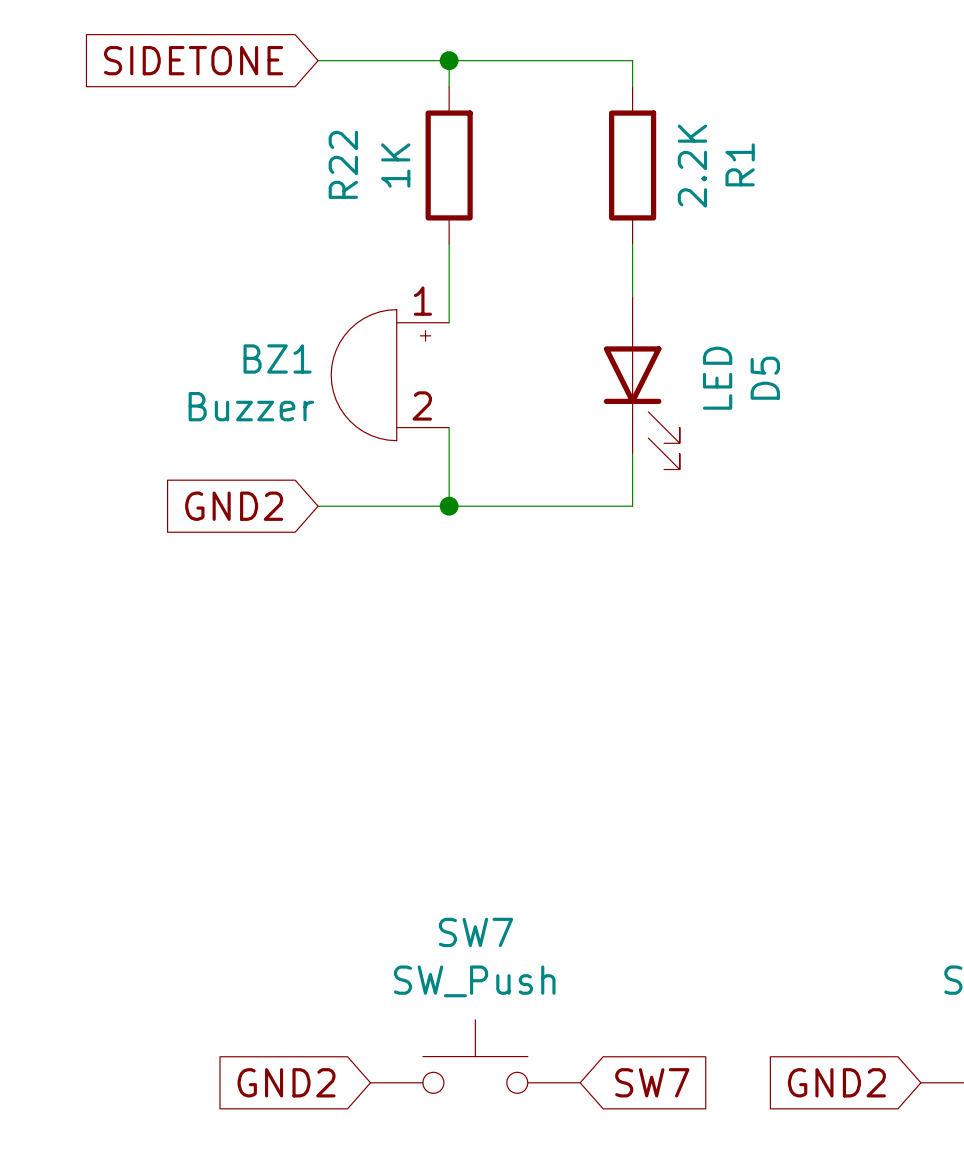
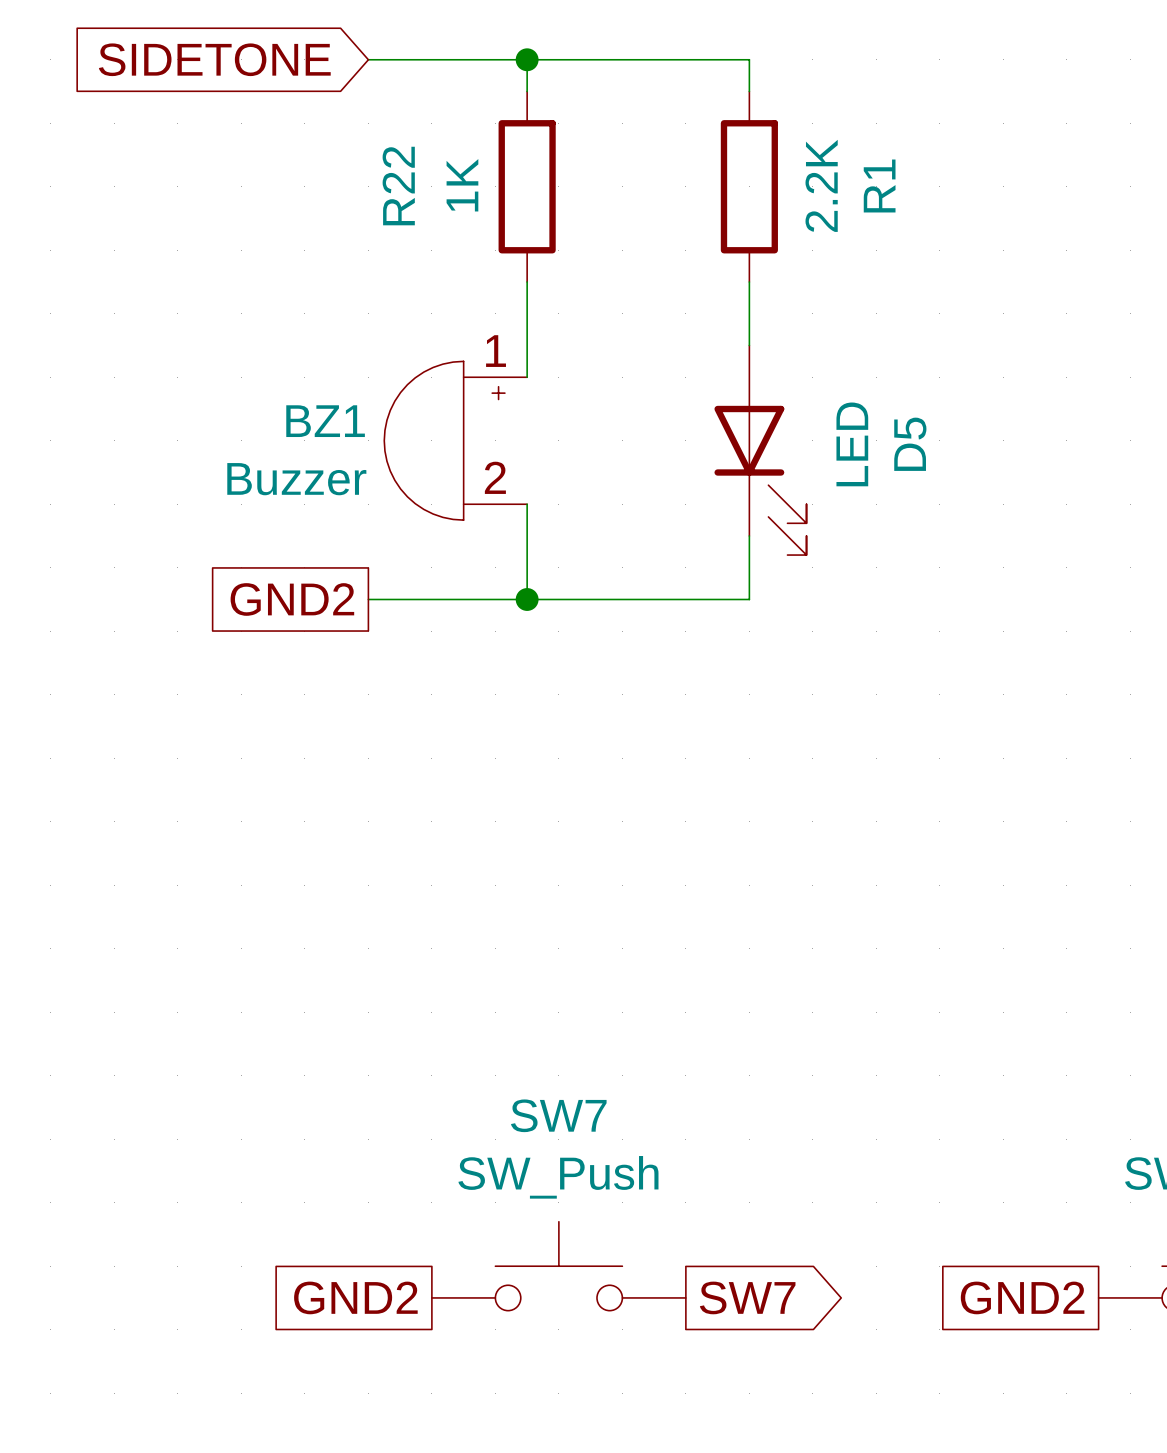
global label shape: input (234, 506) -> passive (292, 599)
global label shape: input (286, 1082) -> passive (355, 1297)
global label shape: input (652, 1082) -> output (747, 1297)
global label shape: input (836, 1082) -> passive (1022, 1297)

